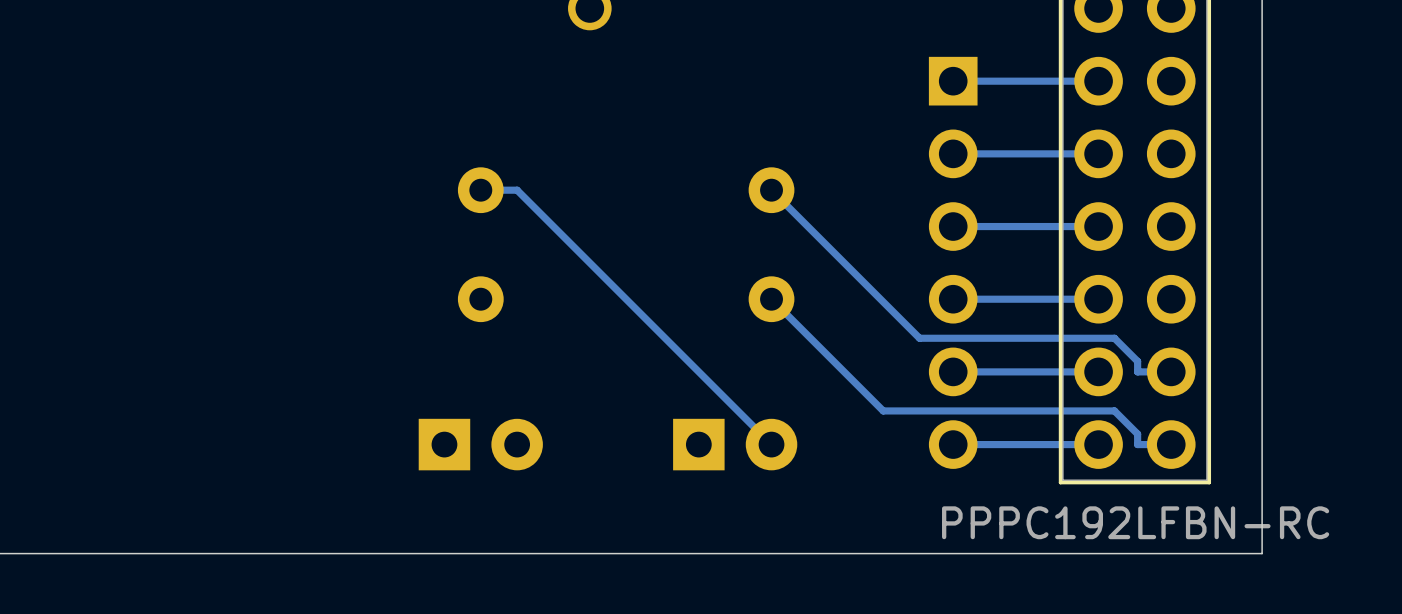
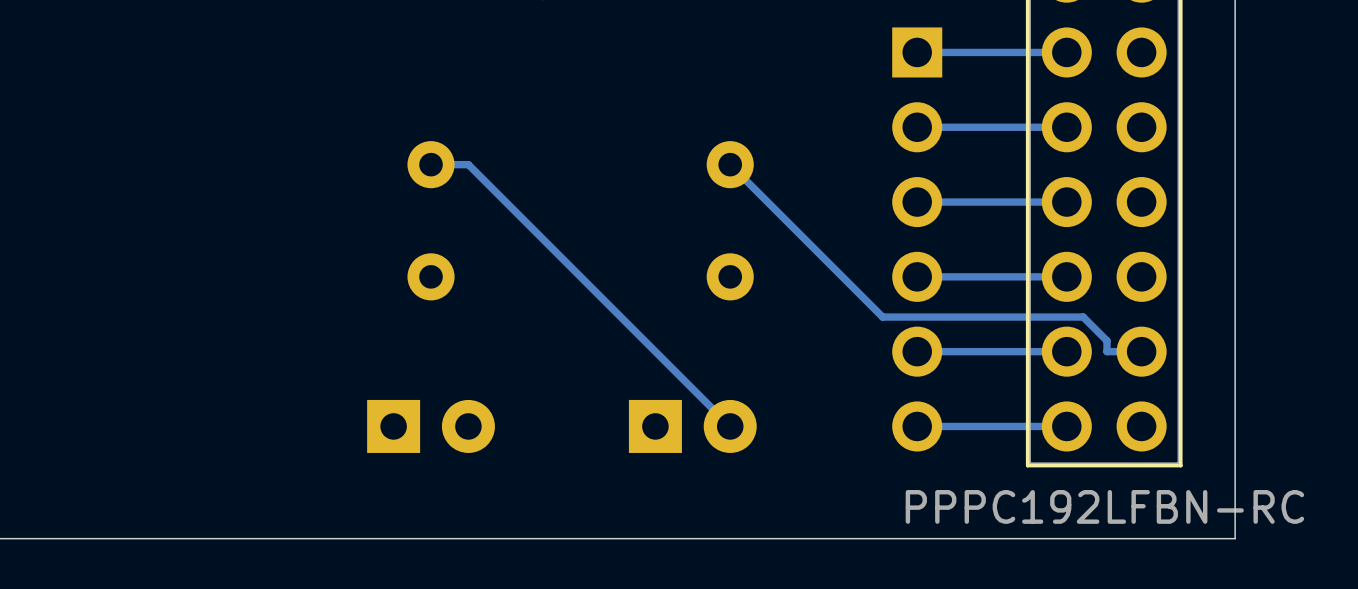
track: (771, 299) (883, 410) (1114, 410) (1137, 434) (1137, 444) (1171, 444) -> none

